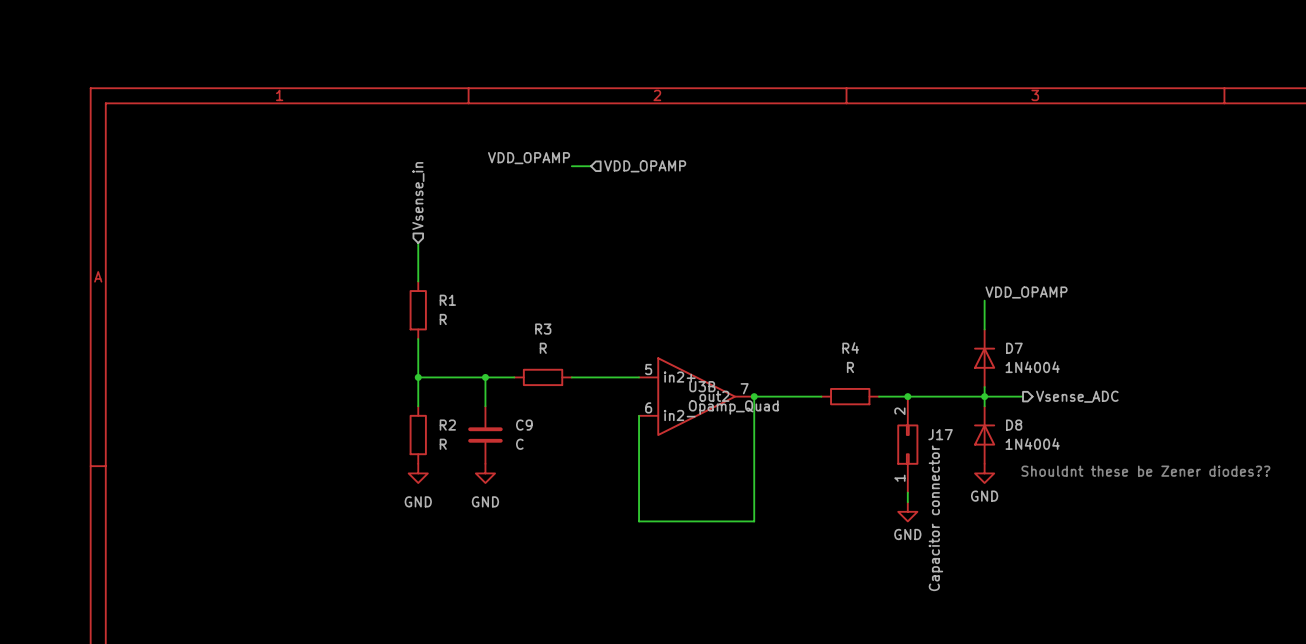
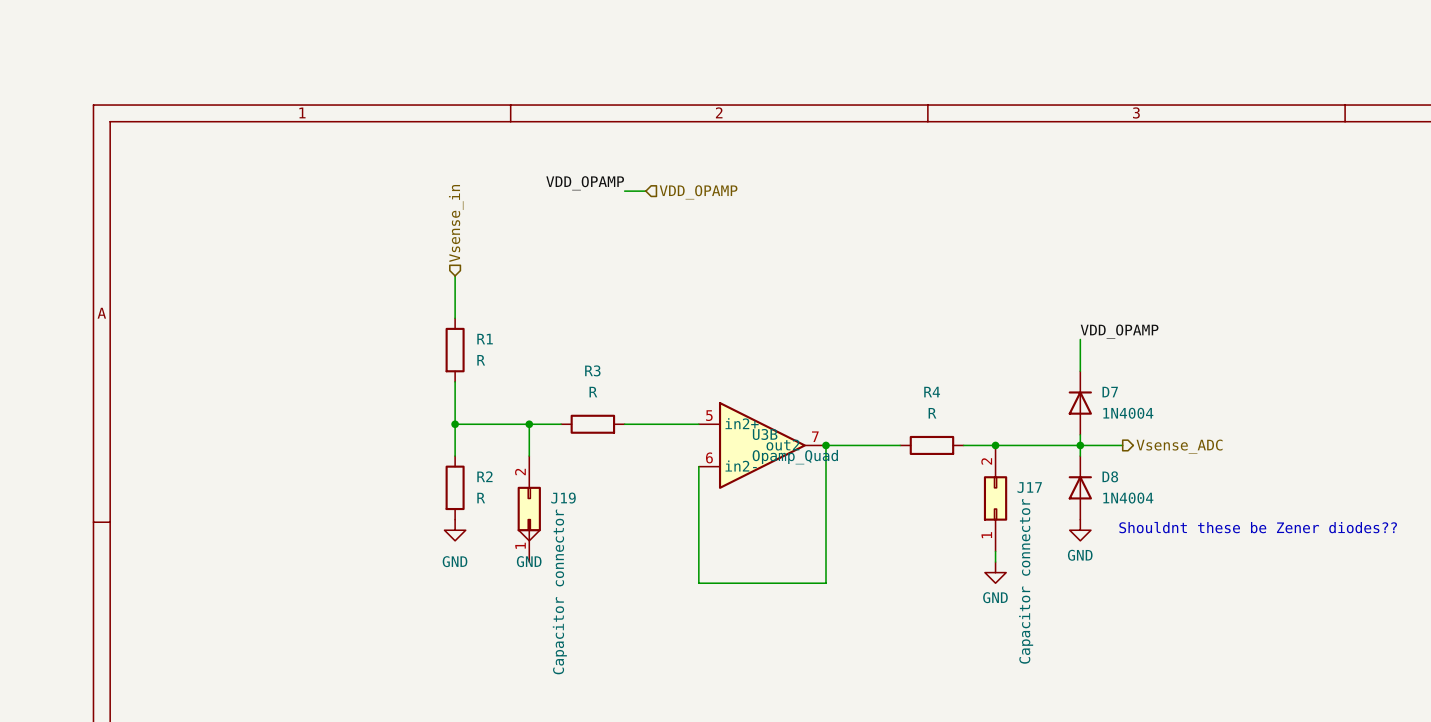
C9: C (485, 435) -> none
J19: none -> Capacitor connector (529, 509)

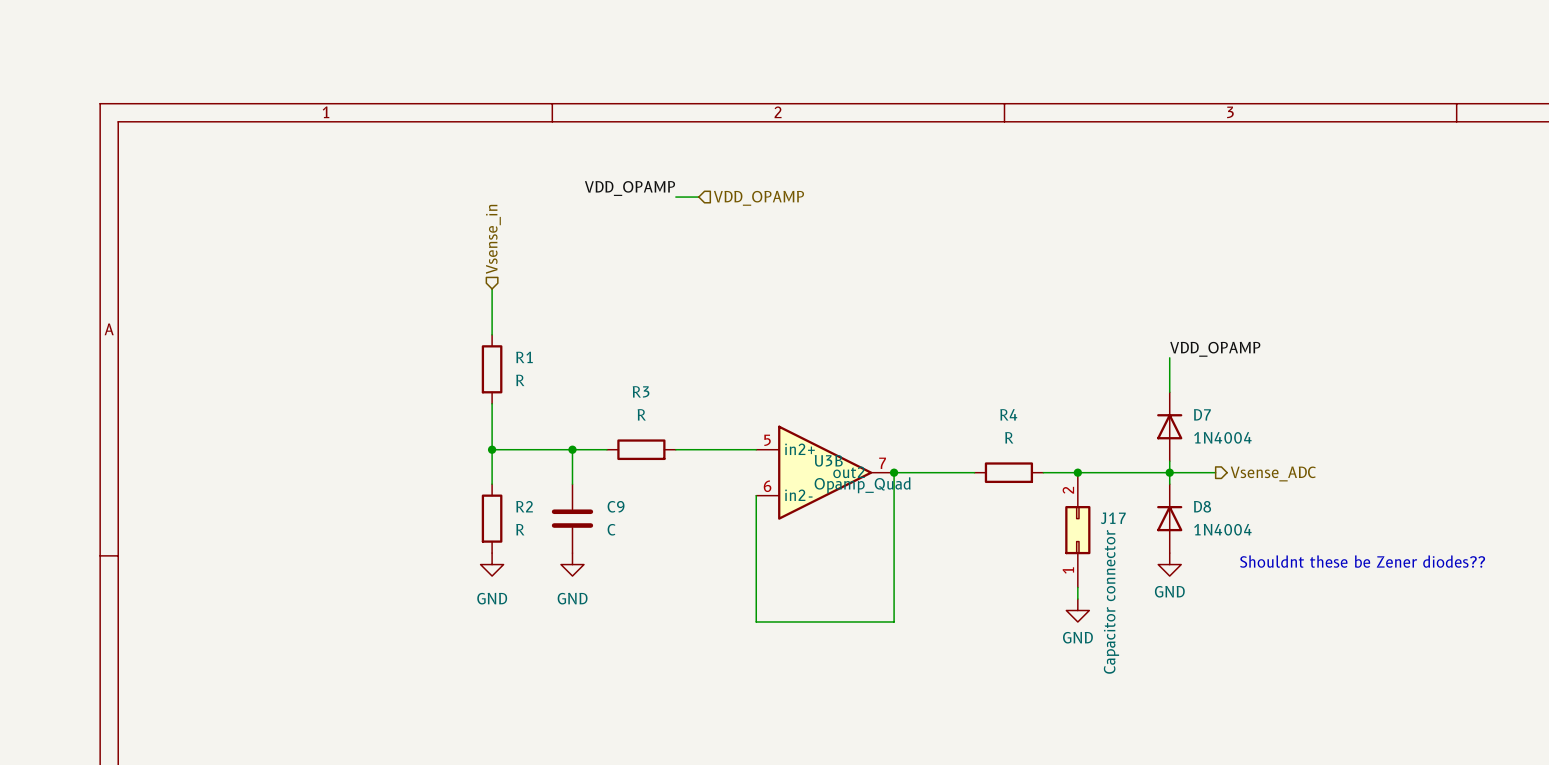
C9: none -> C (572, 518)
J19: Capacitor connector (529, 509) -> none

